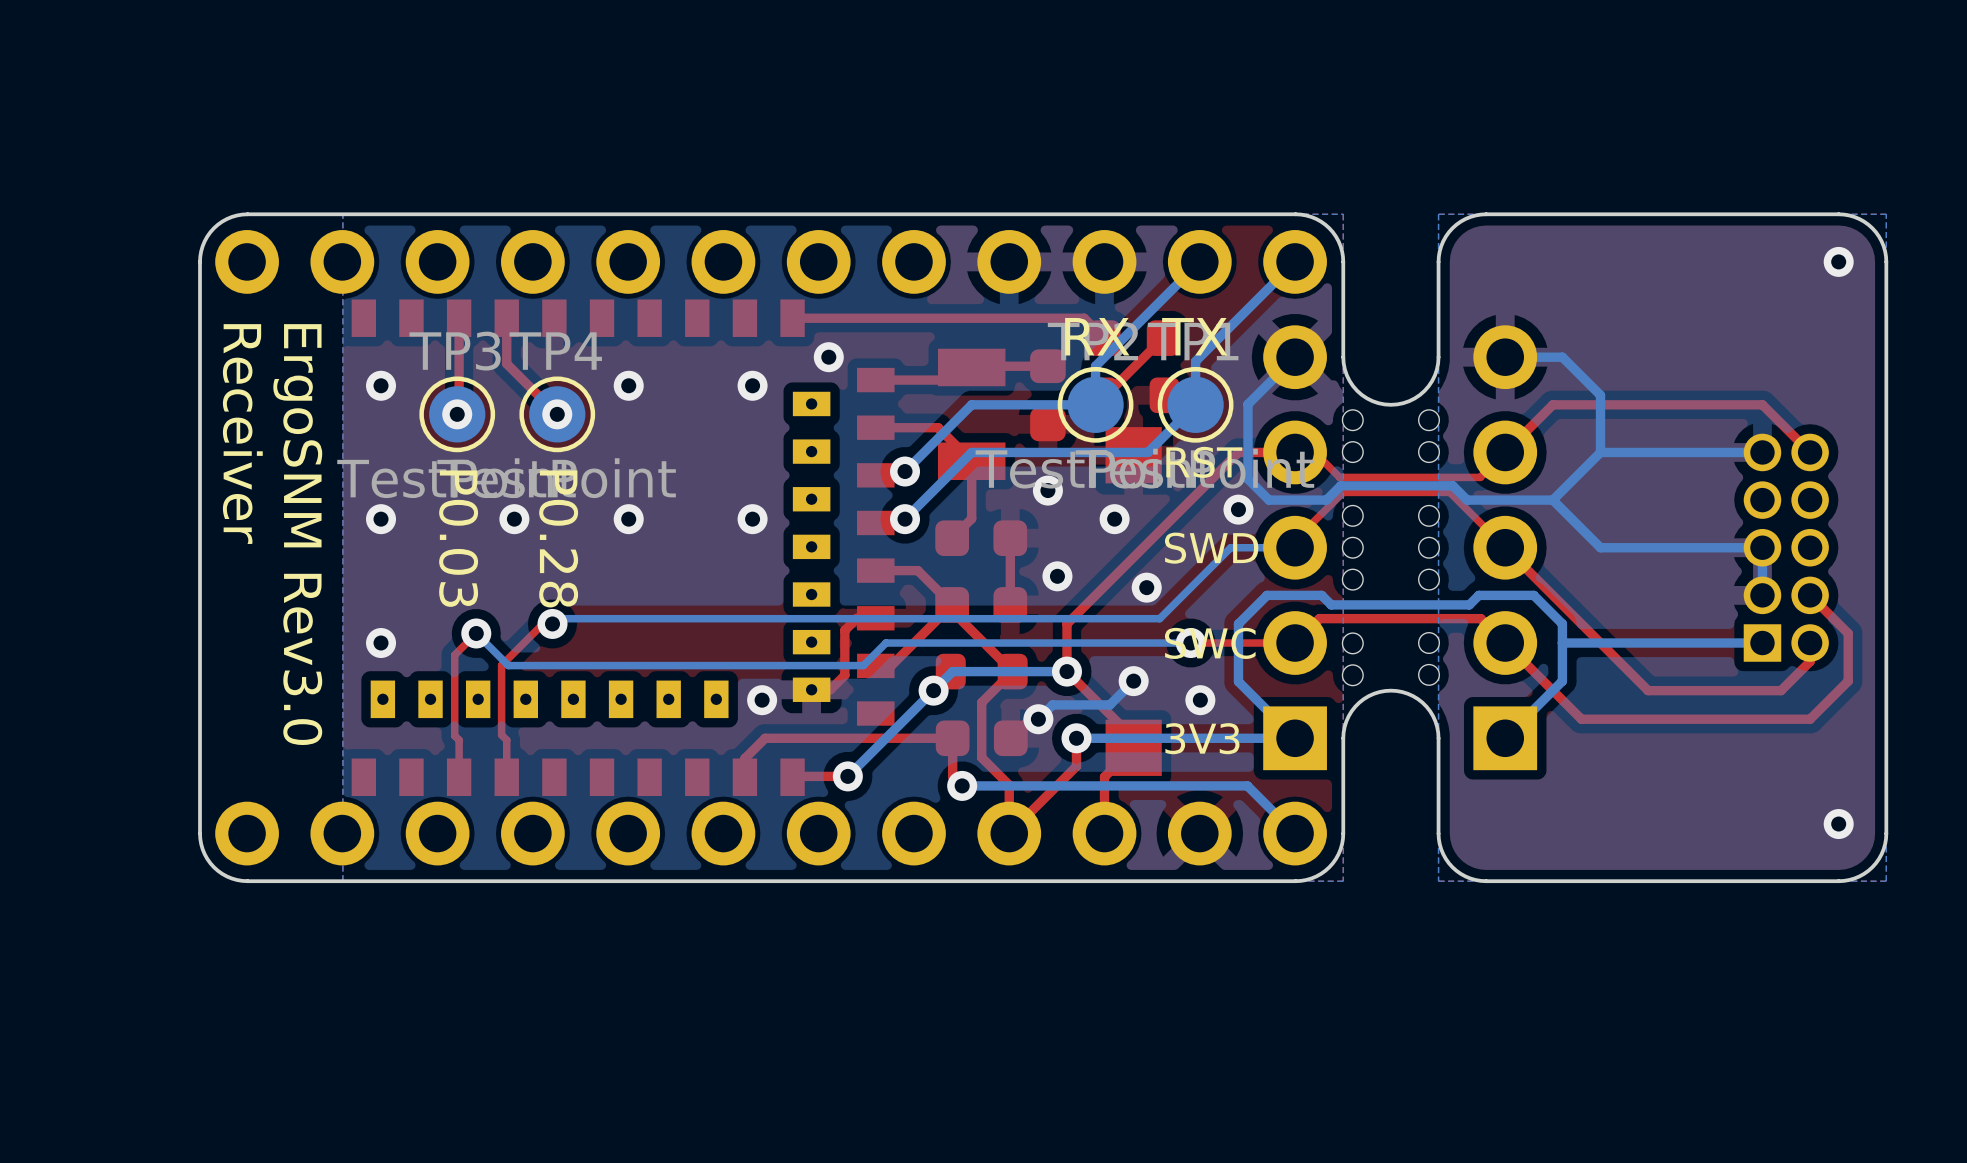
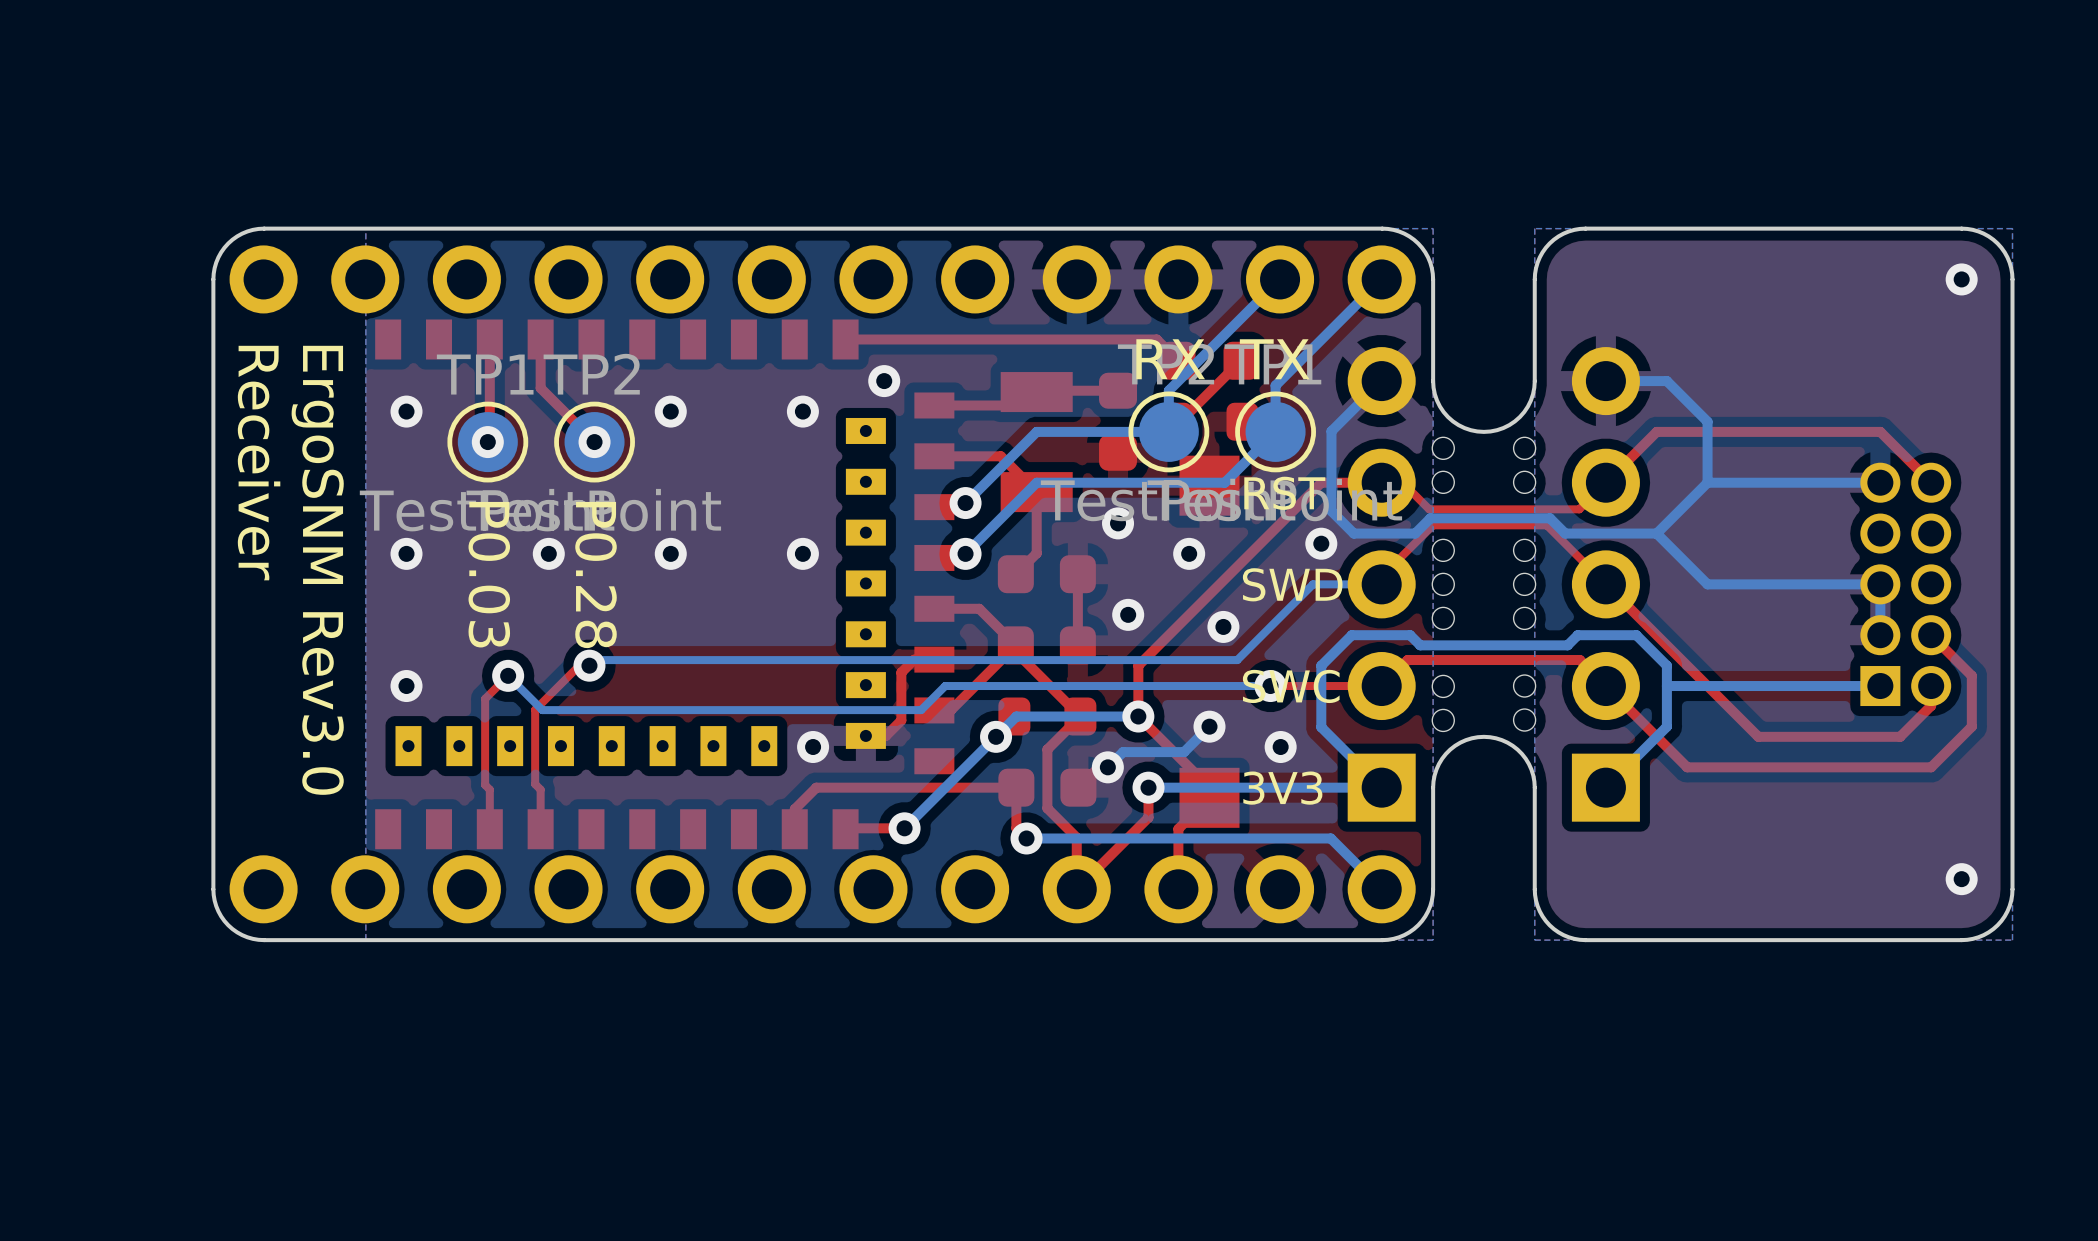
TP3 name: TP3 (455, 351) -> TP1 (485, 374)
TP4 name: TP4 (555, 351) -> TP2 (591, 374)

